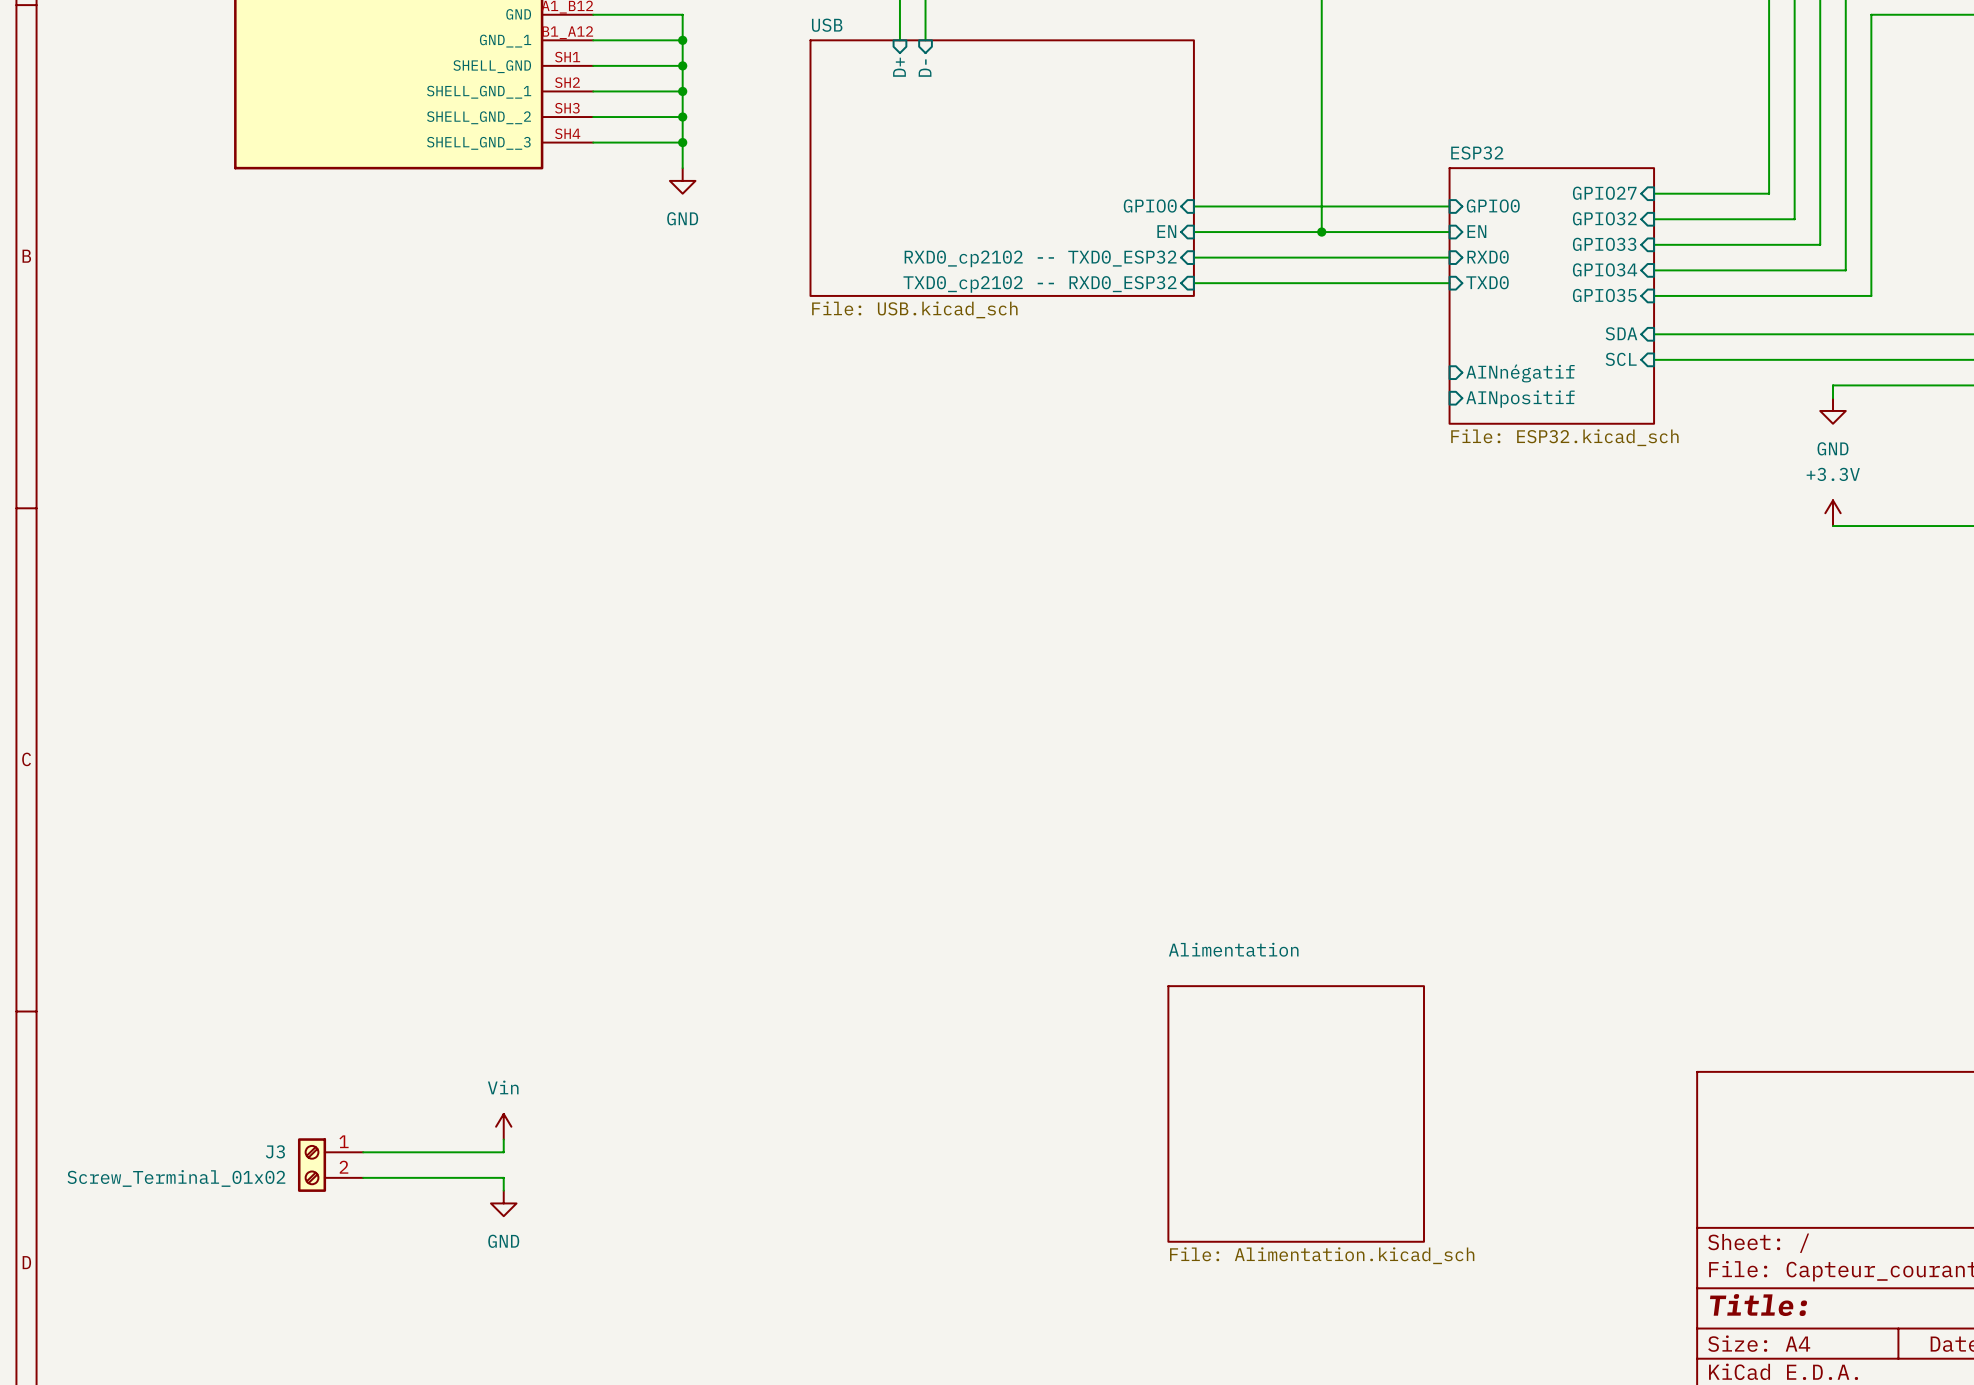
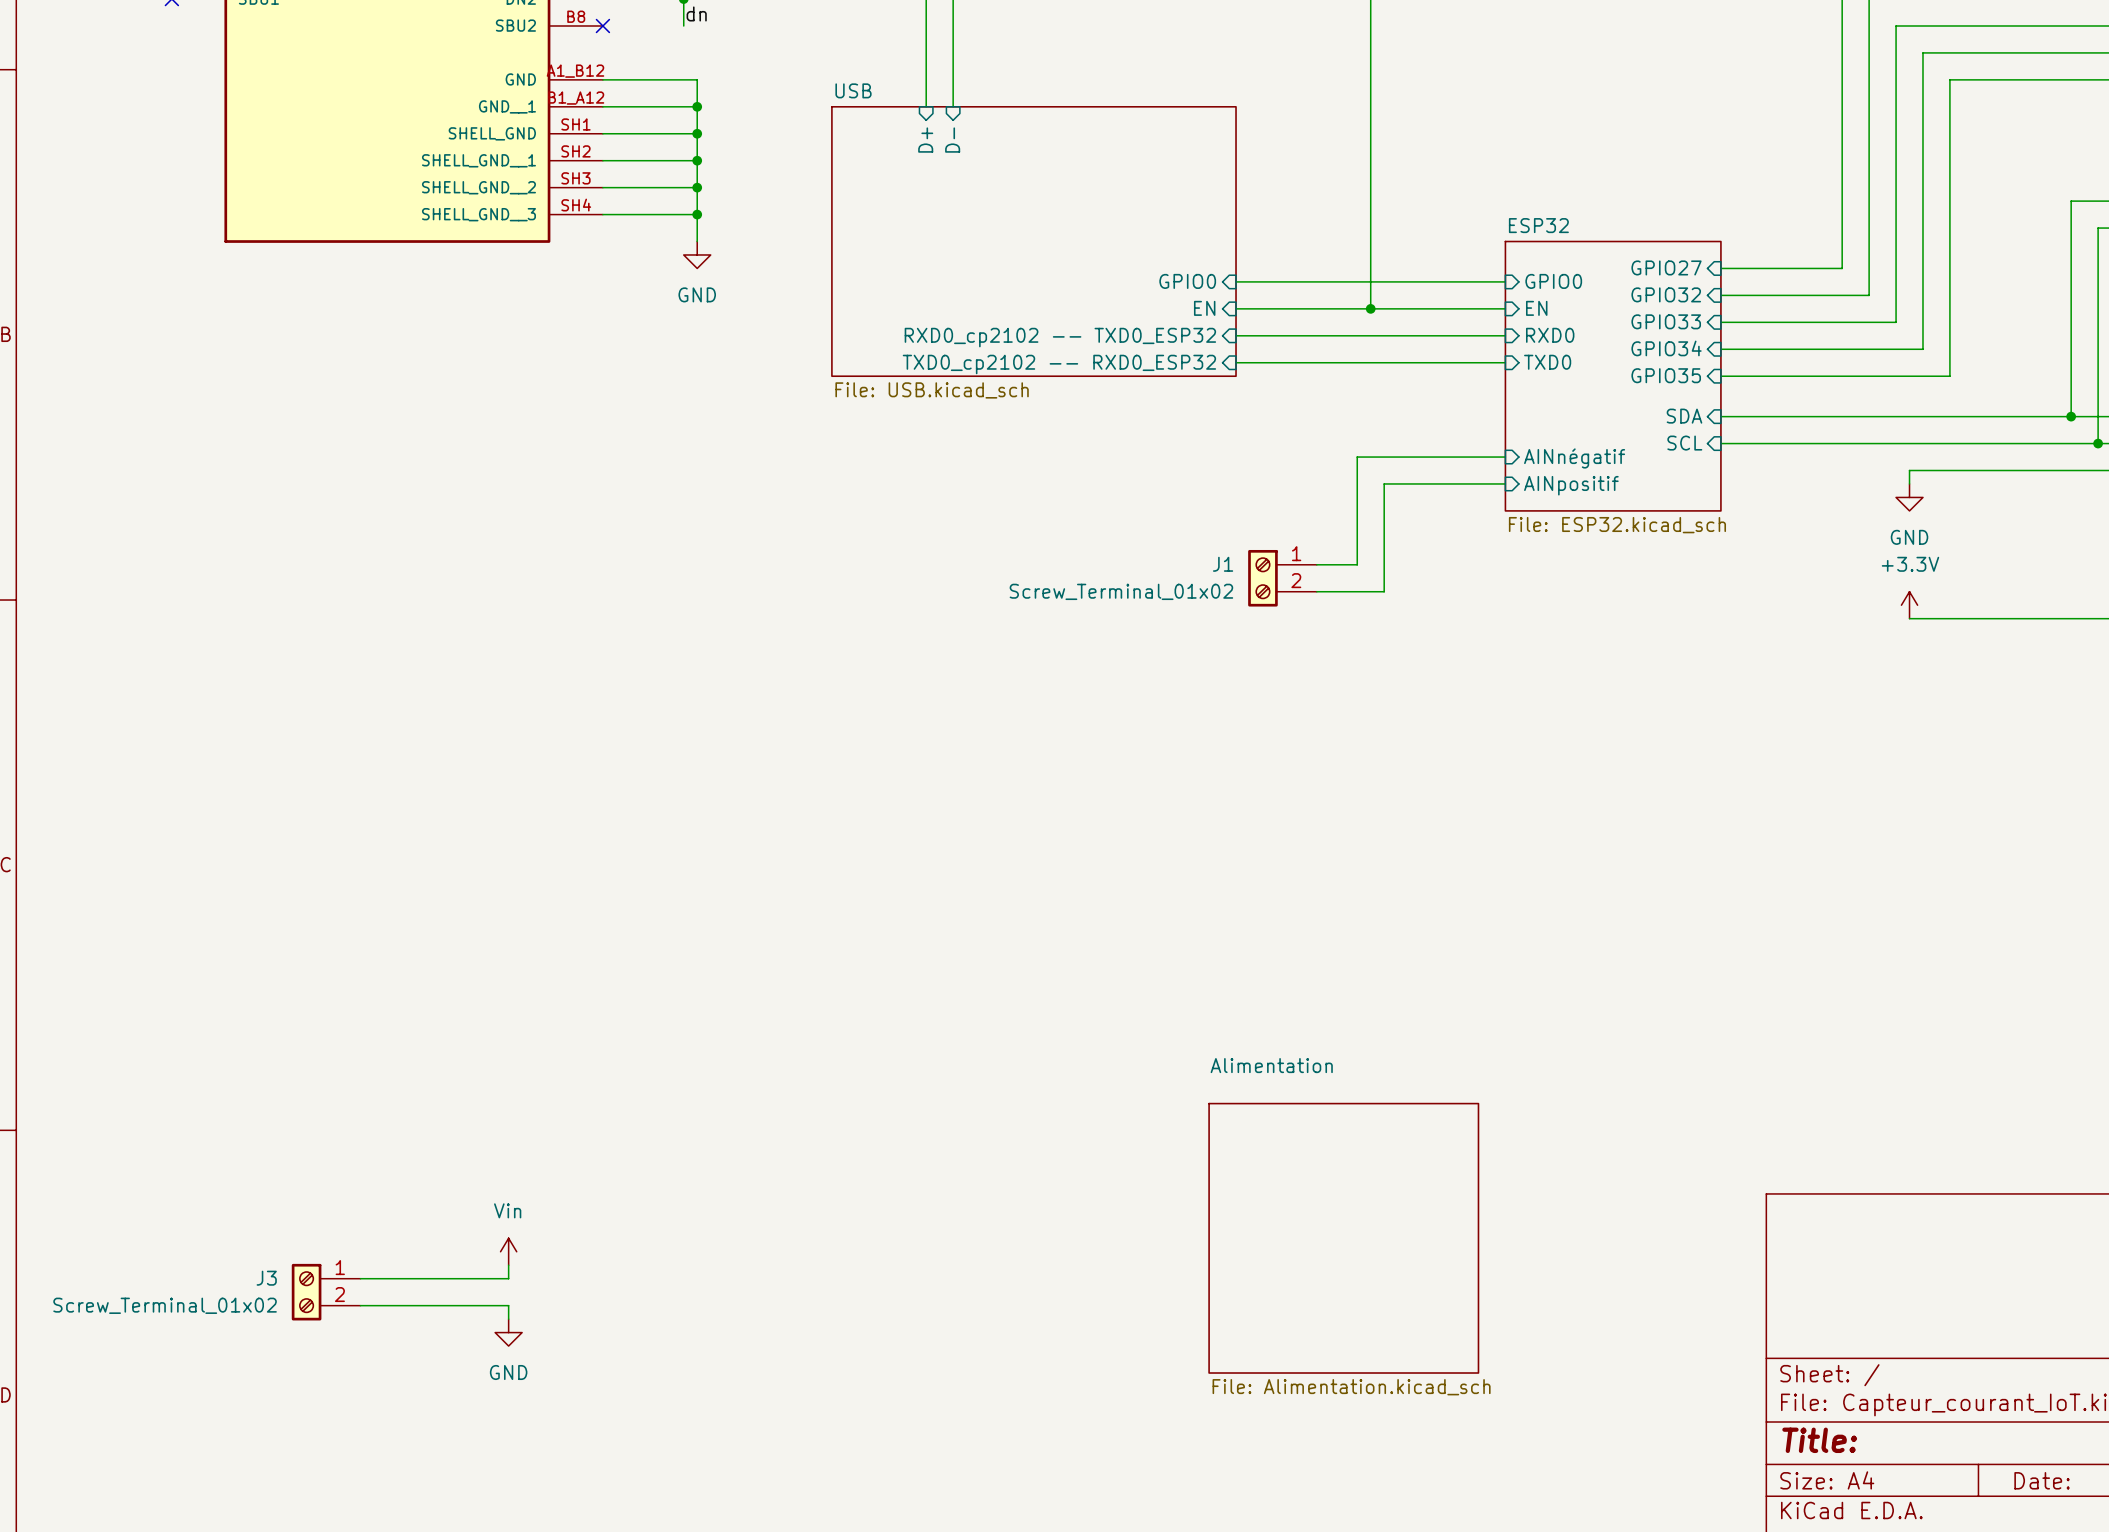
wire: none -> (1505, 457) (1357, 457) (1357, 564) (1316, 564)
wire: none -> (1505, 483) (1384, 483) (1384, 591) (1316, 591)
J1: none -> Screw_Terminal_01x02 (1282, 578)

